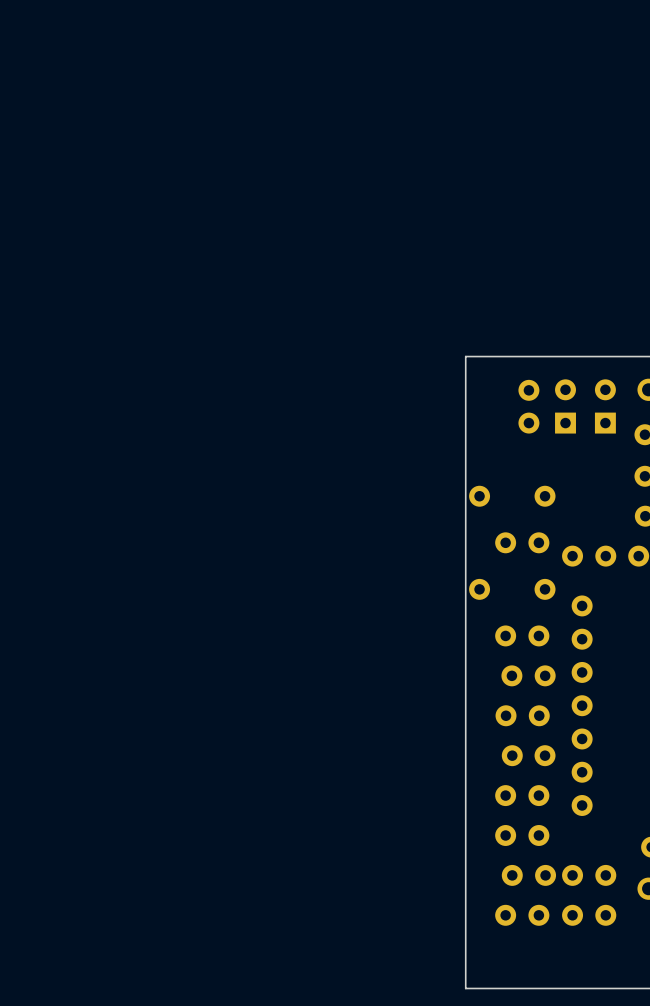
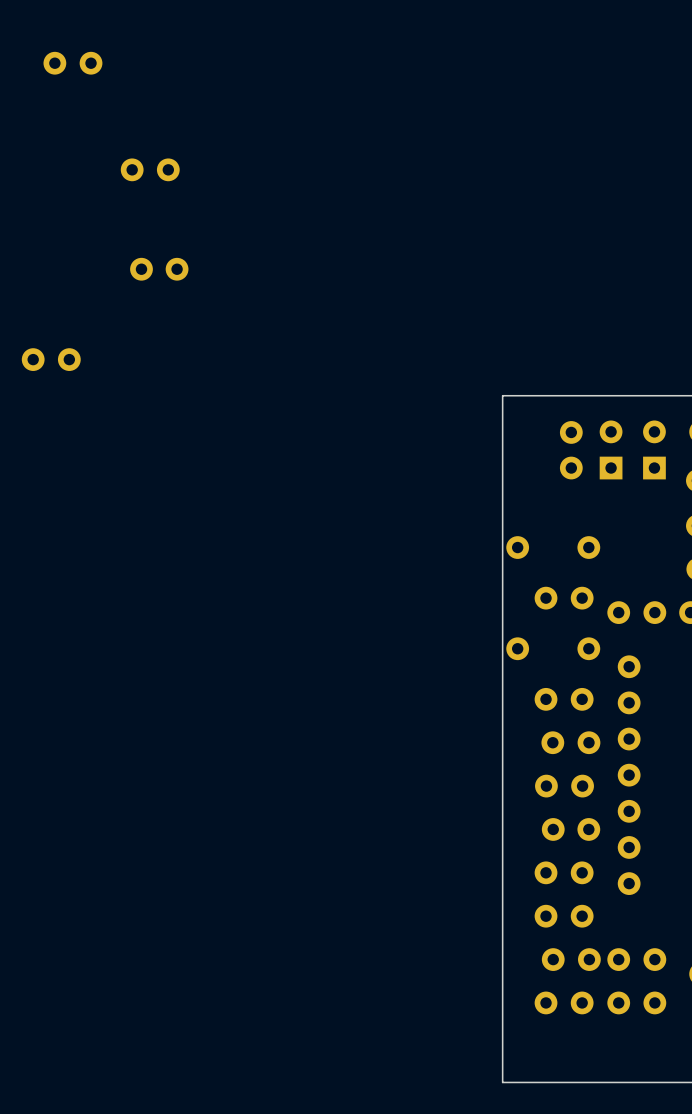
part: none -> (72, 63)
part: none -> (150, 169)
part: none -> (159, 269)
part: none -> (51, 359)

